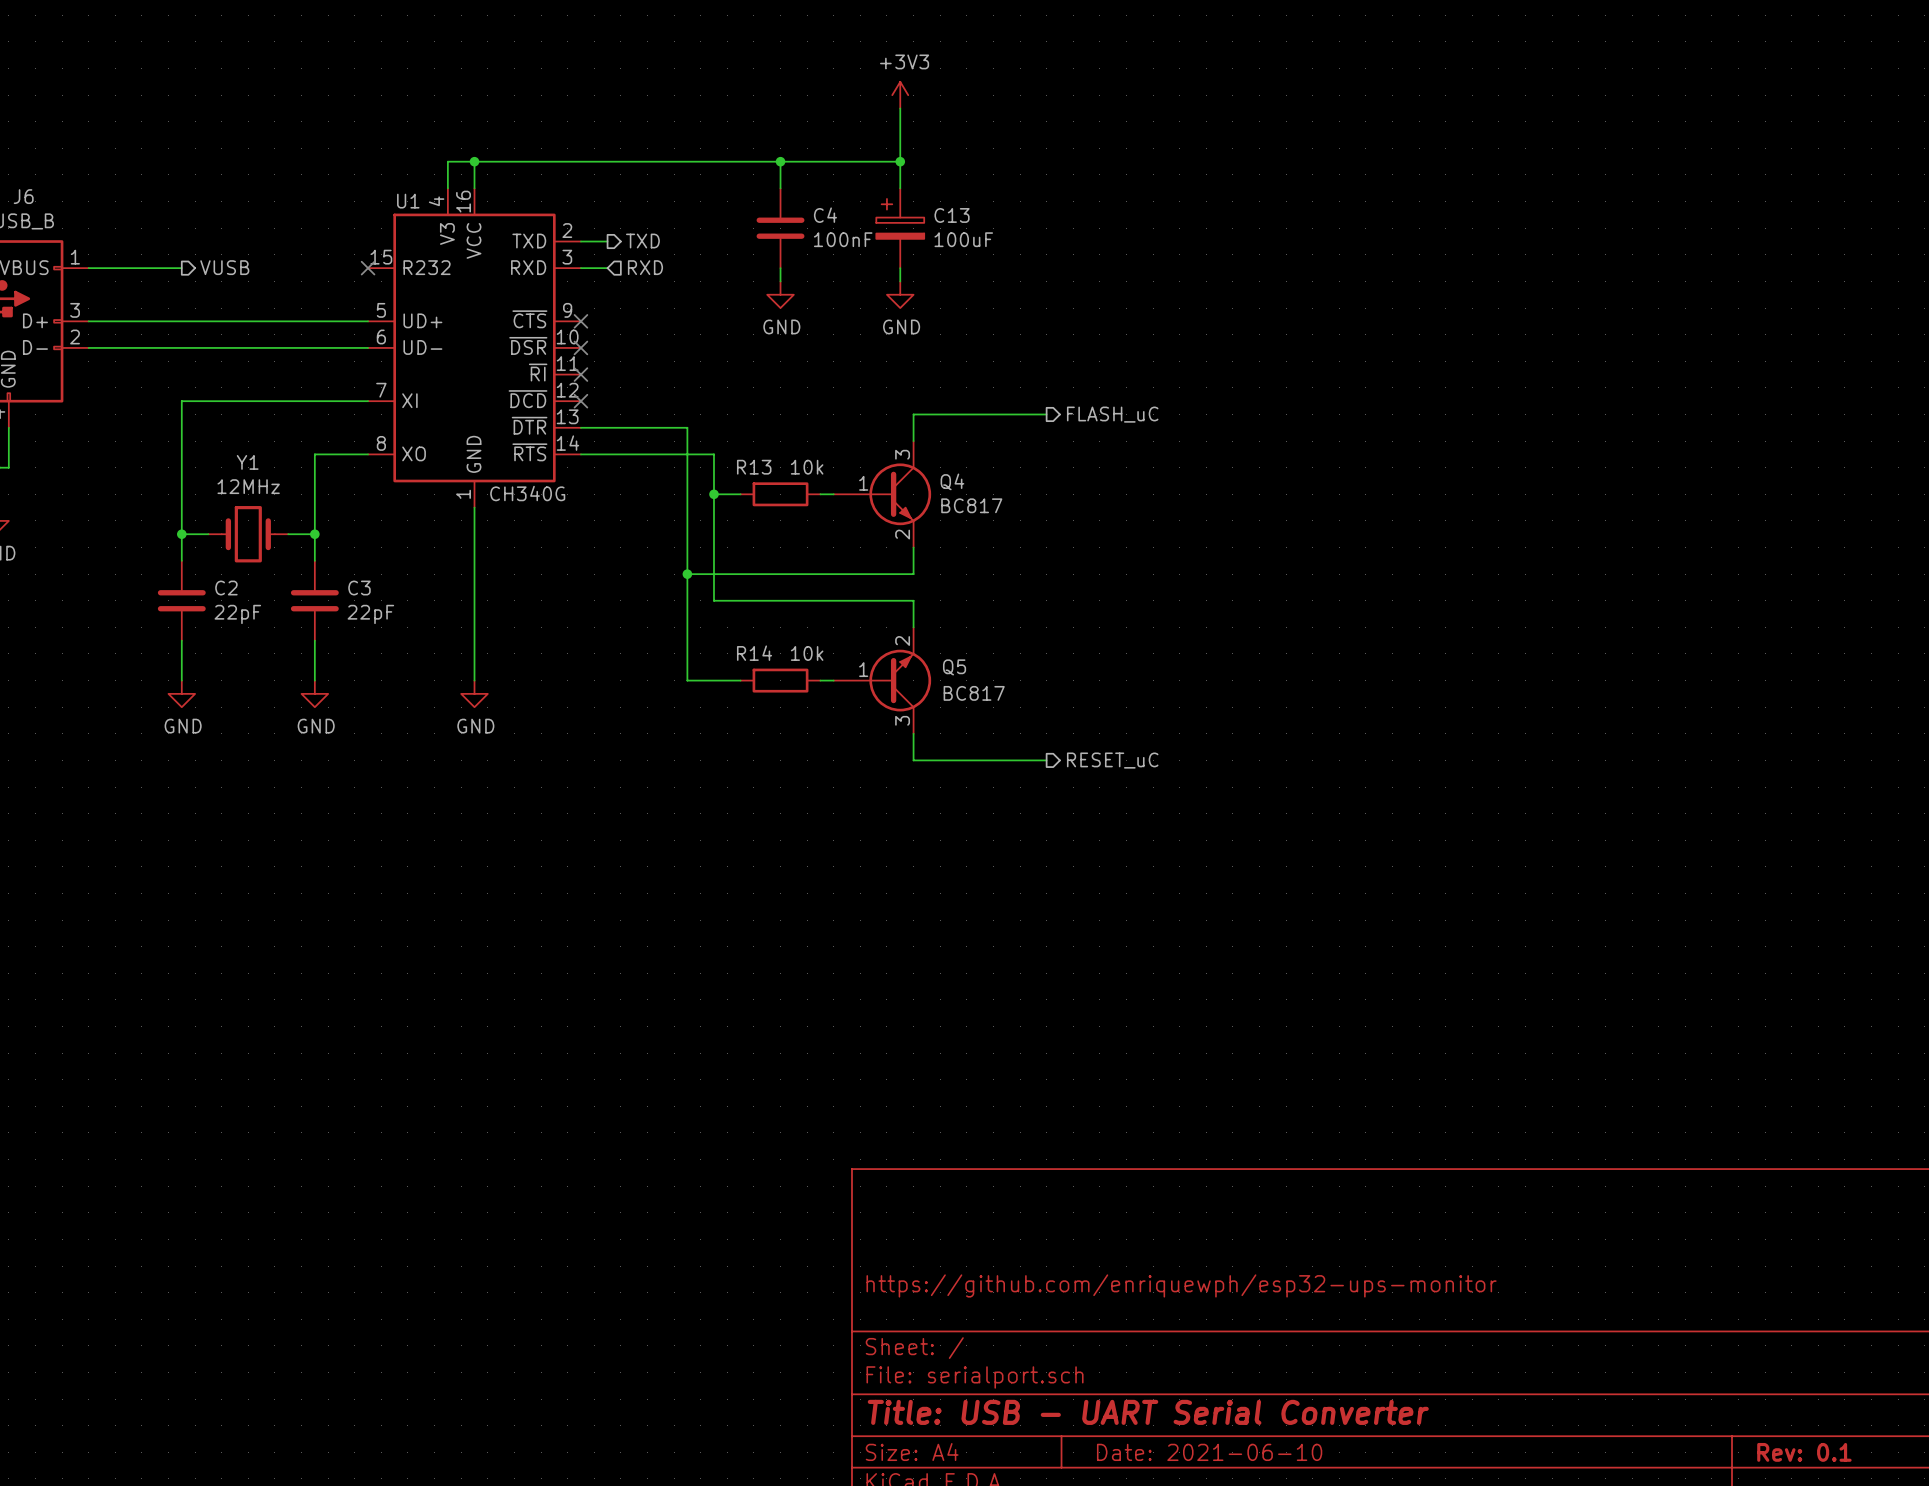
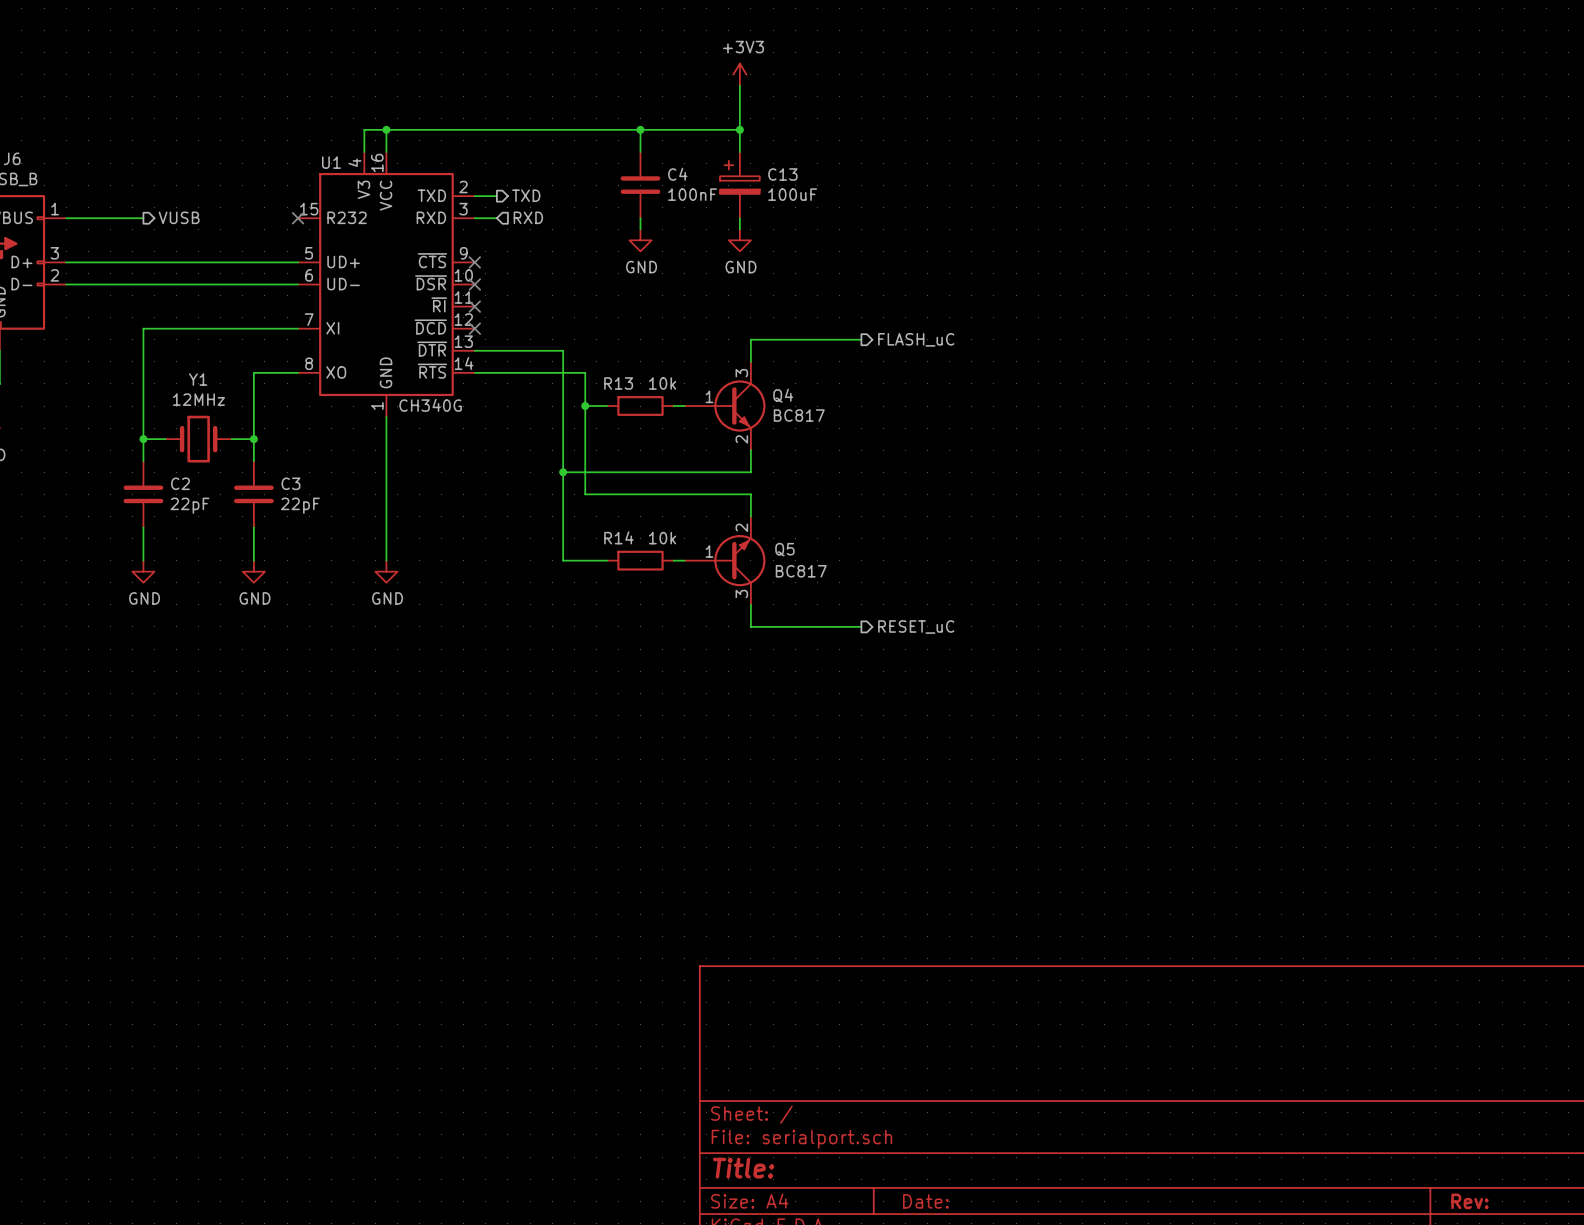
title block: https://github.com/enriquewph/esp32-ups-monitor (1181, 1285) -> none
title block: Title: USB - UART Serial Converter (1148, 1412) -> Title: (743, 1168)
title block: Date: 2021-06-10 (1209, 1452) -> Date: (925, 1201)
title block: Rev: 0.1 (1804, 1452) -> Rev: (1469, 1201)

